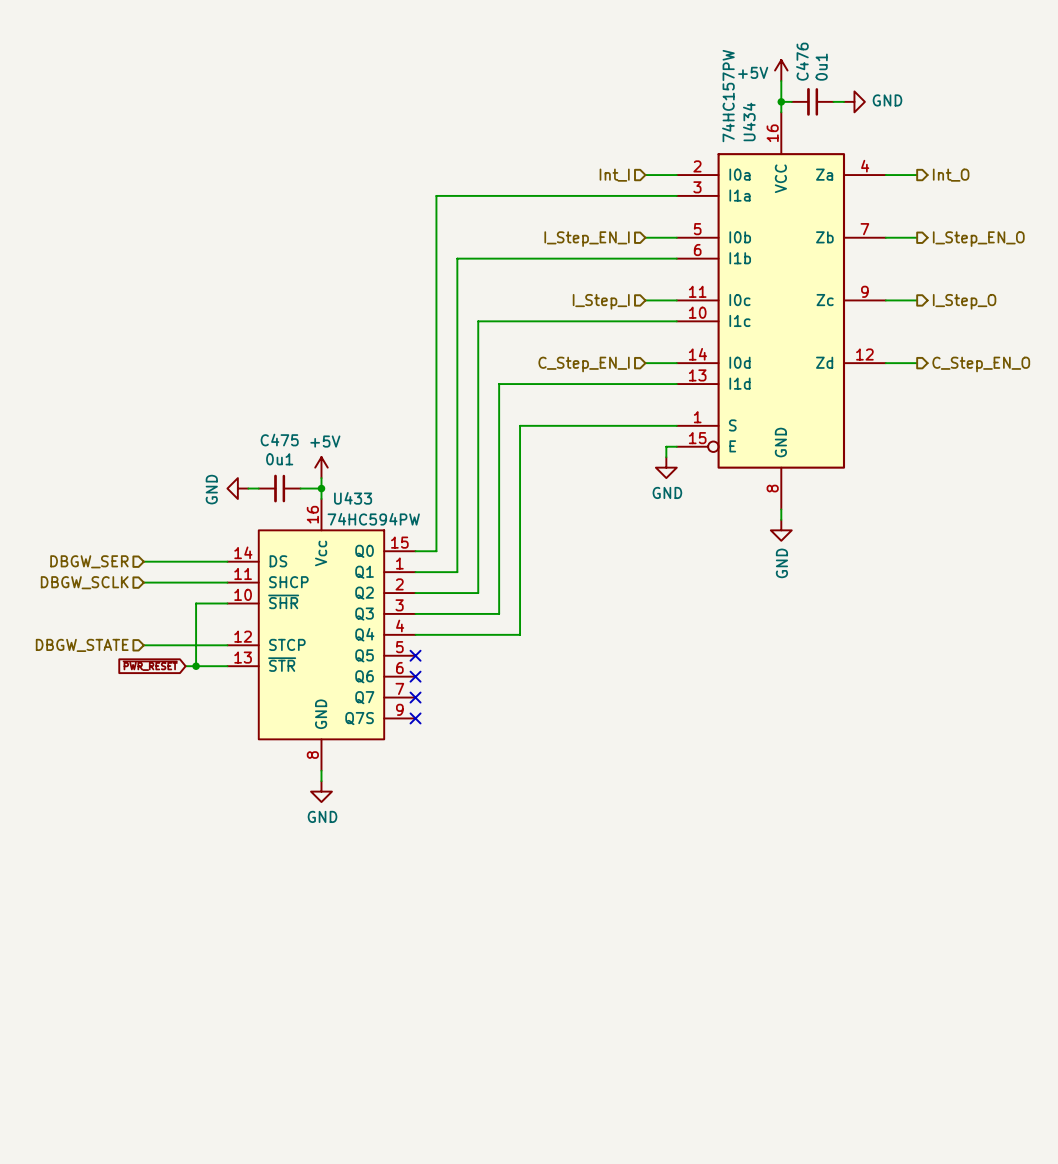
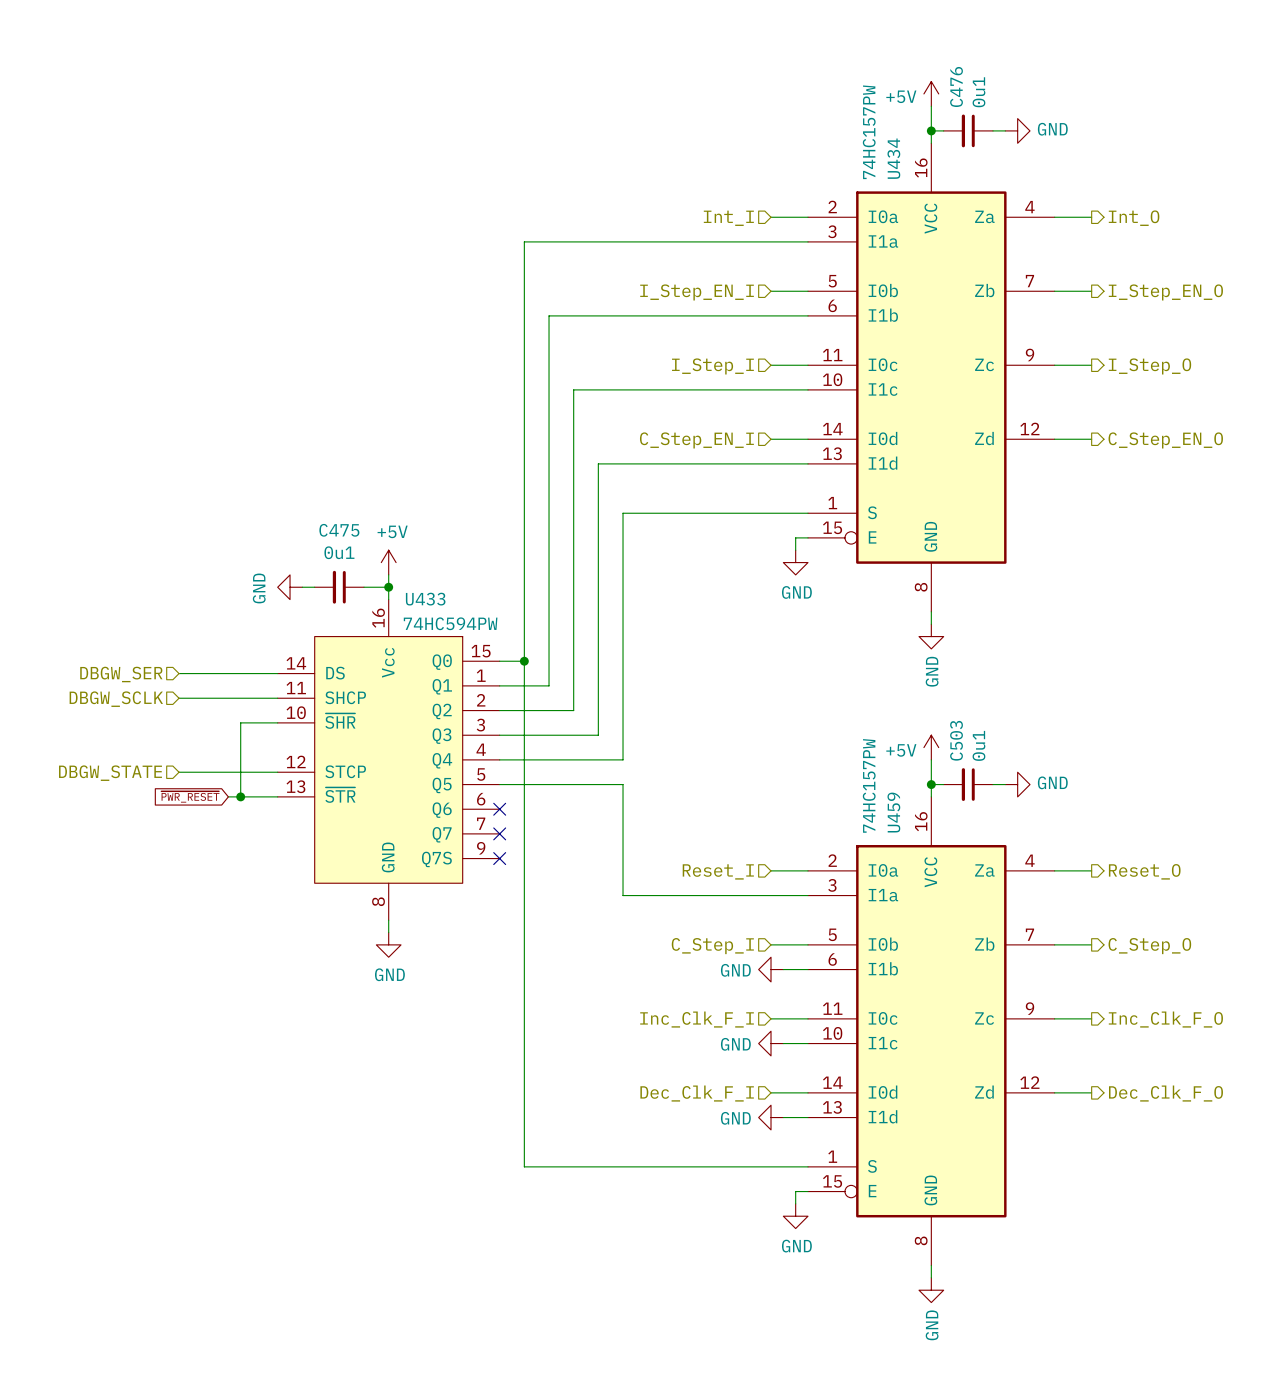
wire: none -> (524, 661) (524, 1166) (808, 1166)
junction: none -> (524, 661)
power symbol: none -> +5V (931, 747)
wire: none -> (931, 759) (931, 796)
wire: none -> (499, 784) (623, 784) (623, 895) (808, 895)
no-connect mark: (415, 655) -> none
wire: none -> (931, 784) (943, 784)
junction: none -> (931, 784)
C503: none -> 0u1 (968, 784)
wire: none -> (992, 784) (1005, 784)
power symbol: none -> GND (1017, 784)
wire: none -> (771, 870) (808, 870)
wire: none -> (1054, 870) (1091, 870)
hierarchical label: none -> Reset_I (718, 871)
hierarchical label: none -> Reset_O (1144, 871)
wire: none -> (771, 944) (808, 944)
wire: none -> (1054, 944) (1091, 944)
hierarchical label: none -> C_Step_I (712, 946)
hierarchical label: none -> C_Step_O (1149, 946)
power symbol: none -> GND (771, 969)
wire: none -> (783, 969) (808, 969)
hierarchical label: none -> Inc_Clk_F_I (697, 1019)
wire: none -> (771, 1018) (808, 1018)
wire: none -> (1054, 1018) (1091, 1018)
hierarchical label: none -> Inc_Clk_F_O (1165, 1019)
U459: none -> 74HC157PW (931, 1031)
power symbol: none -> GND (771, 1043)
wire: none -> (783, 1043) (808, 1043)
hierarchical label: none -> Dec_Clk_F_I (697, 1093)
wire: none -> (771, 1092) (808, 1092)
wire: none -> (1054, 1092) (1091, 1092)
hierarchical label: none -> Dec_Clk_F_O (1165, 1093)
power symbol: none -> GND (771, 1117)
wire: none -> (783, 1117) (808, 1117)
wire: none -> (808, 1191) (795, 1191) (795, 1203)
power symbol: none -> GND (795, 1216)
wire: none -> (931, 1265) (931, 1277)
power symbol: none -> GND (931, 1290)

